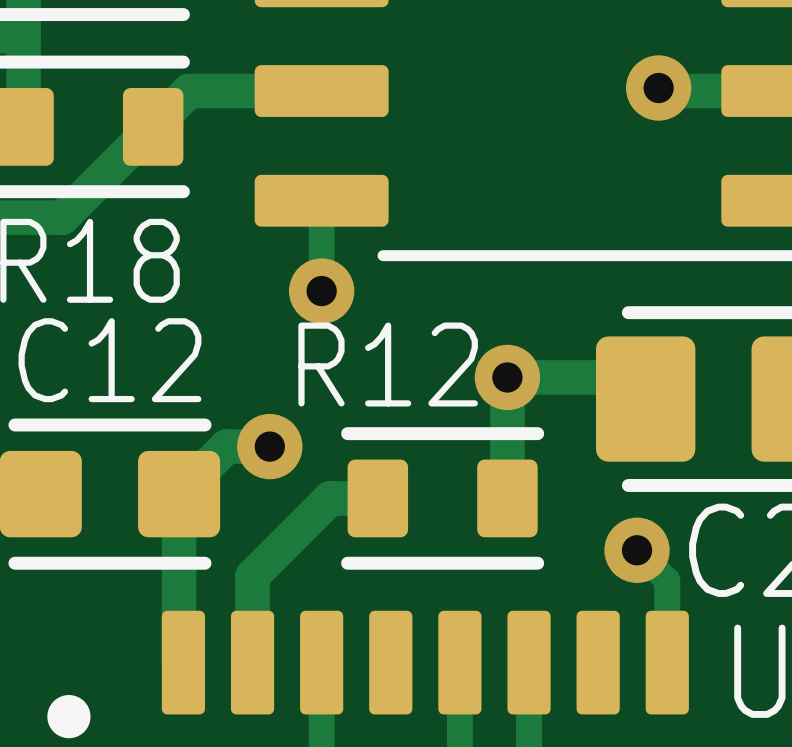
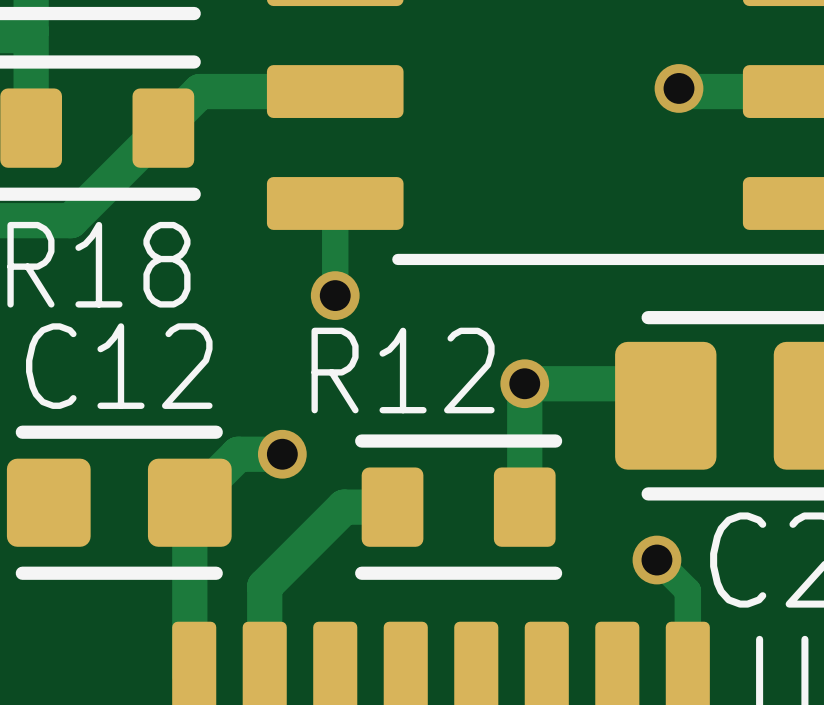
via size: [625, 55, 692, 121] -> [654, 64, 704, 113]
via size: [288, 258, 355, 324] -> [310, 271, 360, 320]
via size: [474, 344, 541, 411] -> [500, 359, 550, 409]
via size: [237, 413, 303, 480] -> [257, 429, 307, 479]
via size: [604, 517, 670, 583] -> [632, 535, 682, 585]

